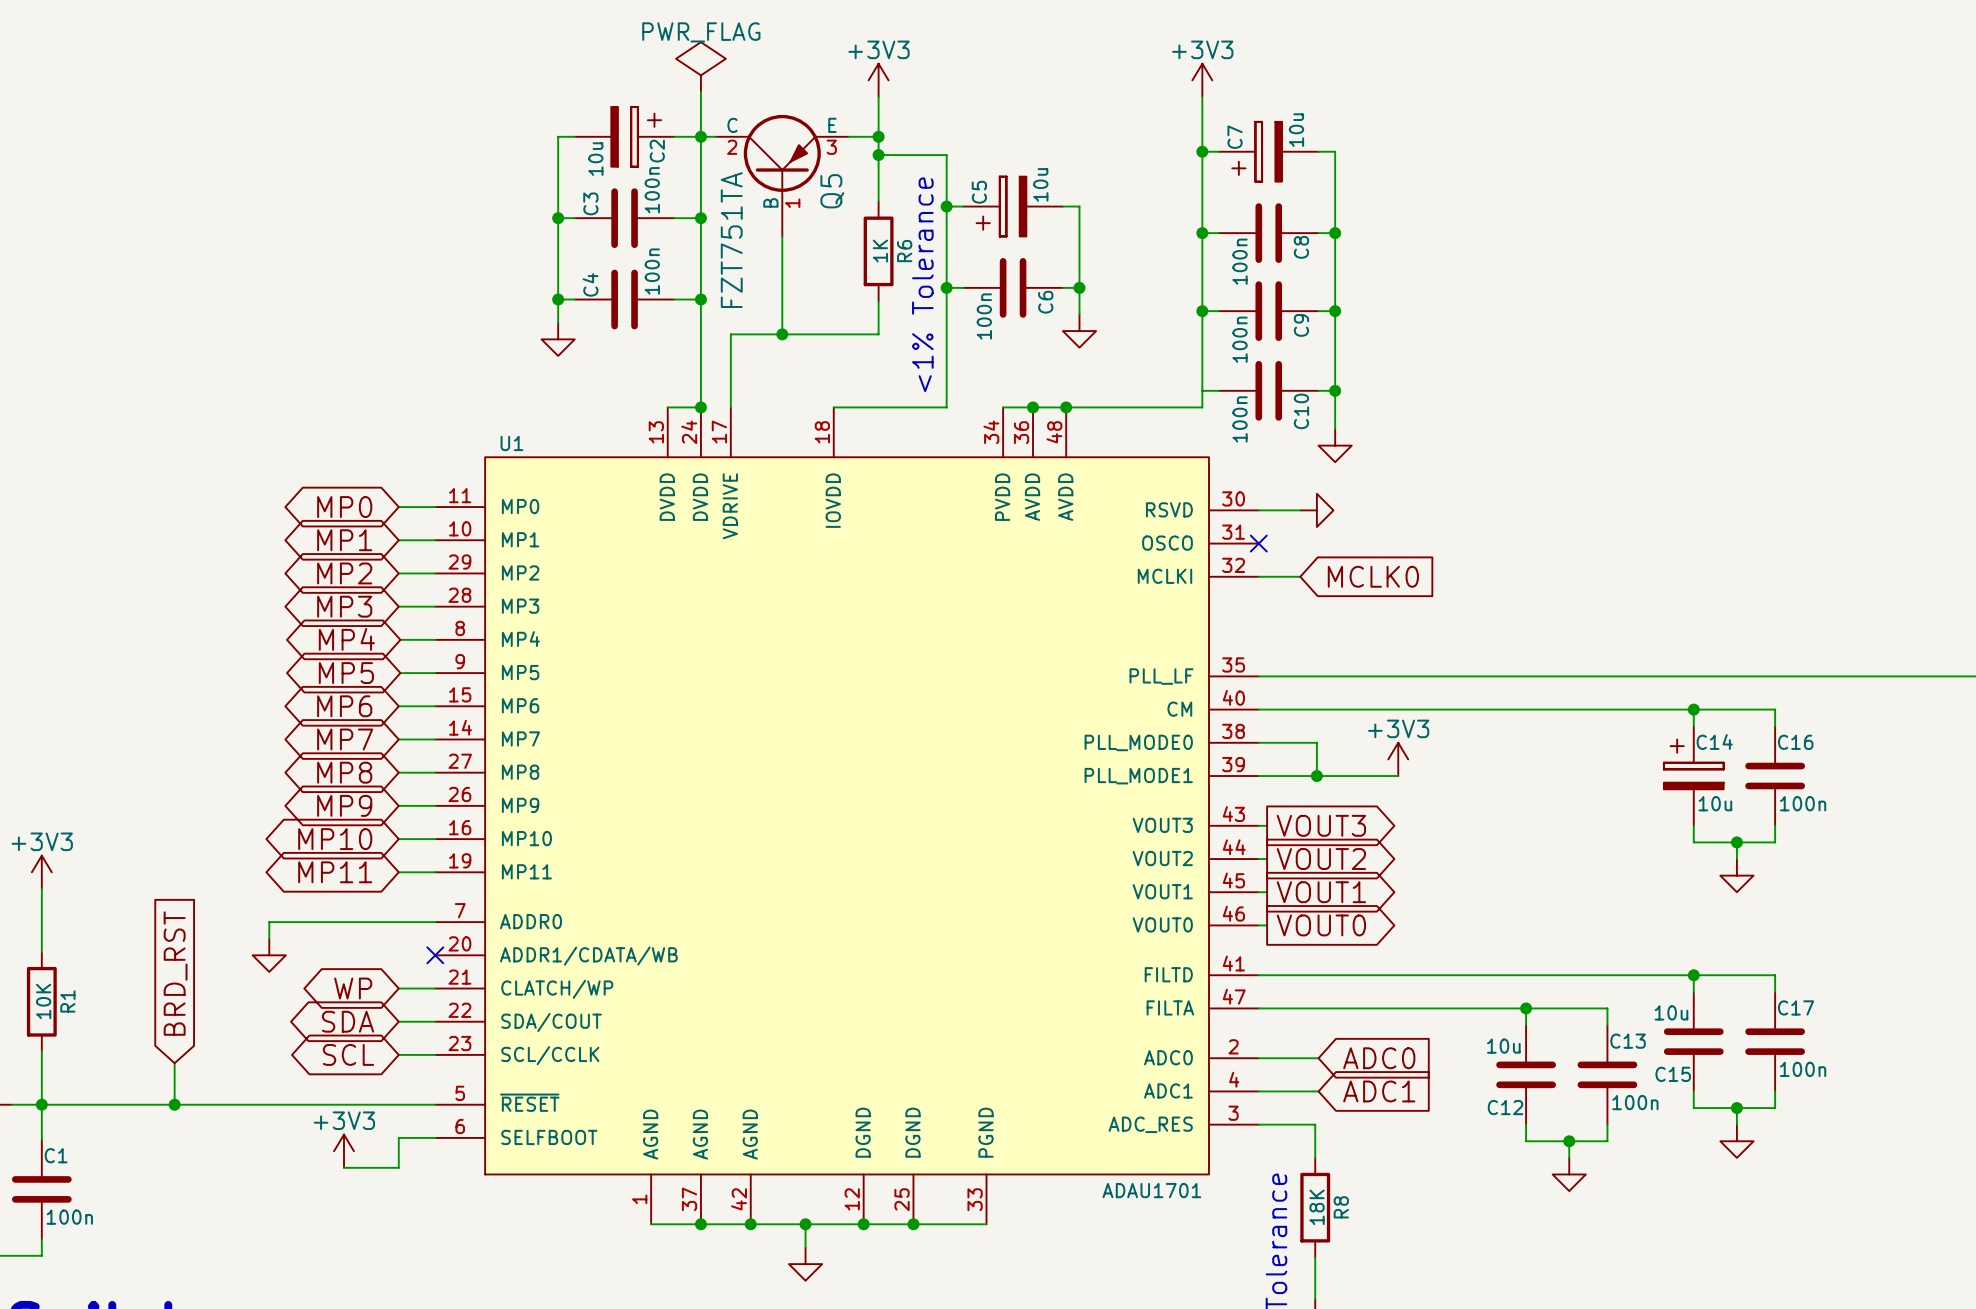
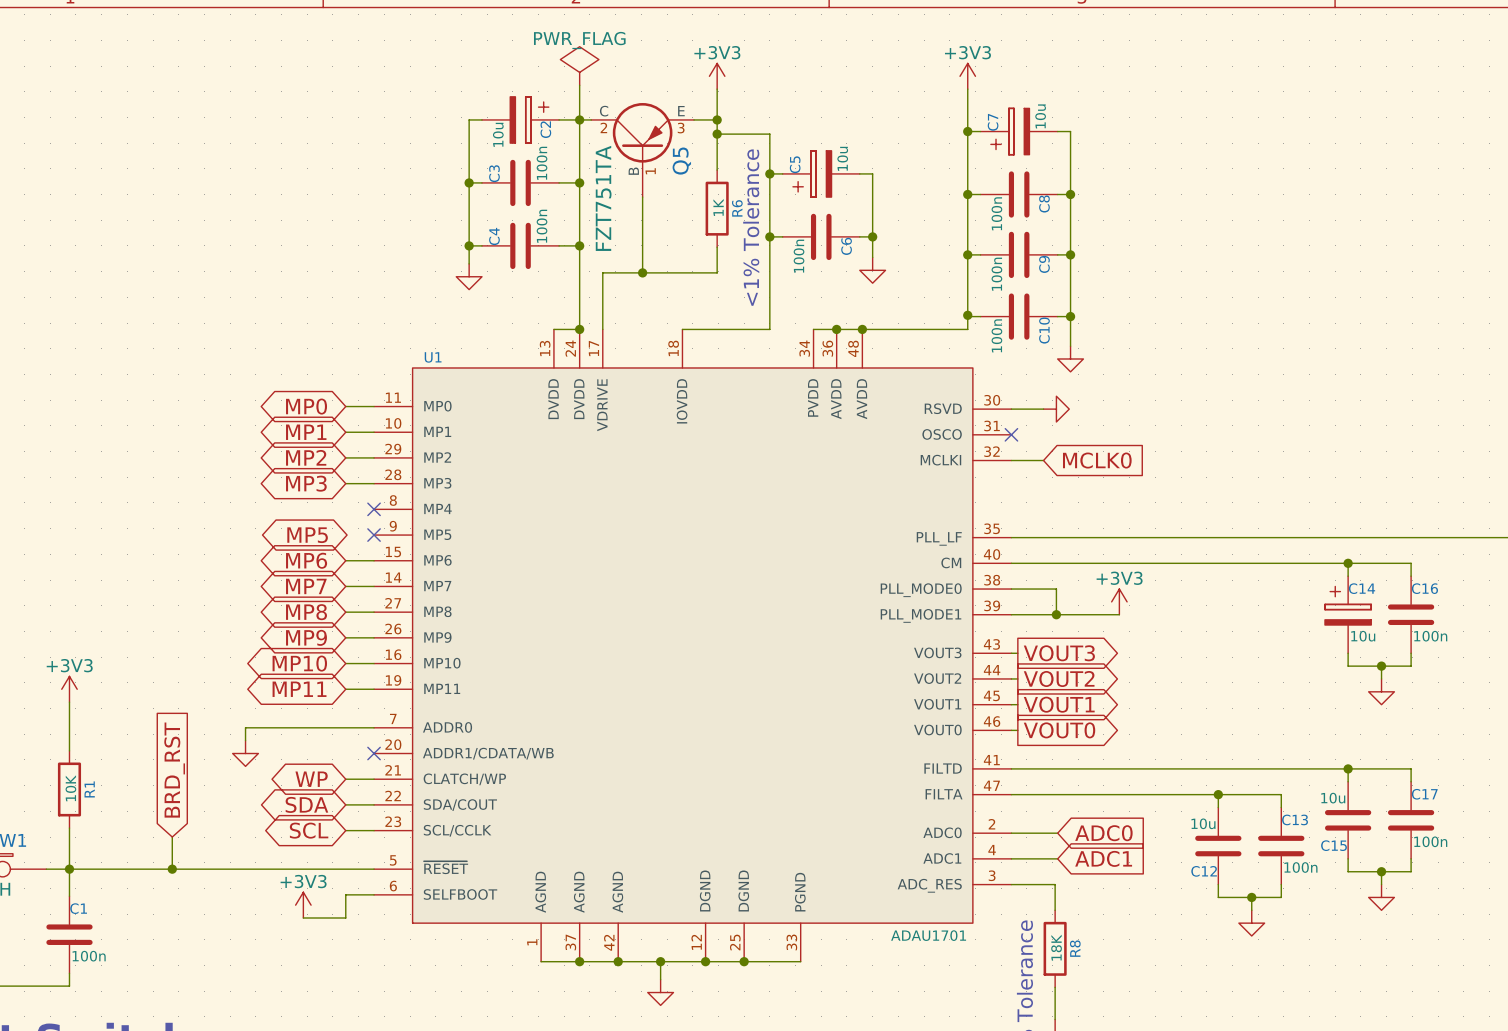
junction: none -> (967, 315)
global label: MP4 (346, 639) -> none
wire: (400, 639) (435, 639) -> none
no-connect mark: none -> (374, 509)
wire: (400, 673) (435, 673) -> none
no-connect mark: none -> (374, 535)

